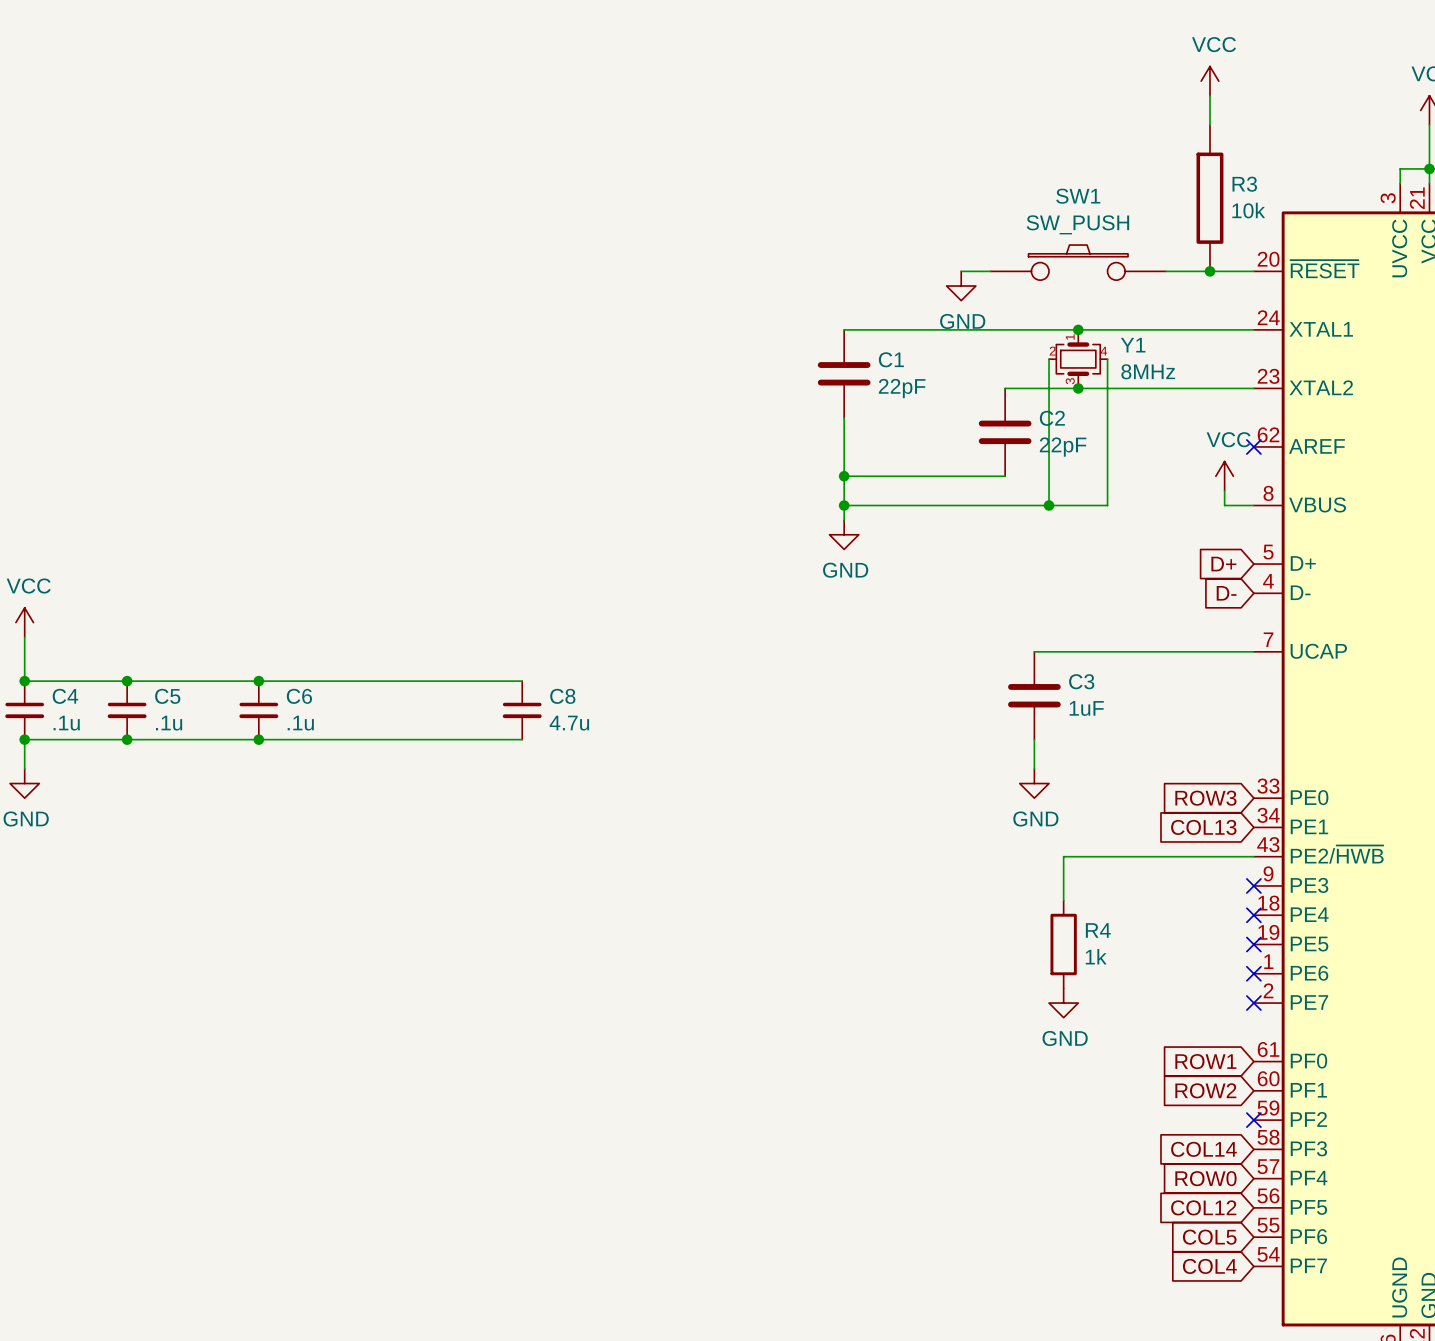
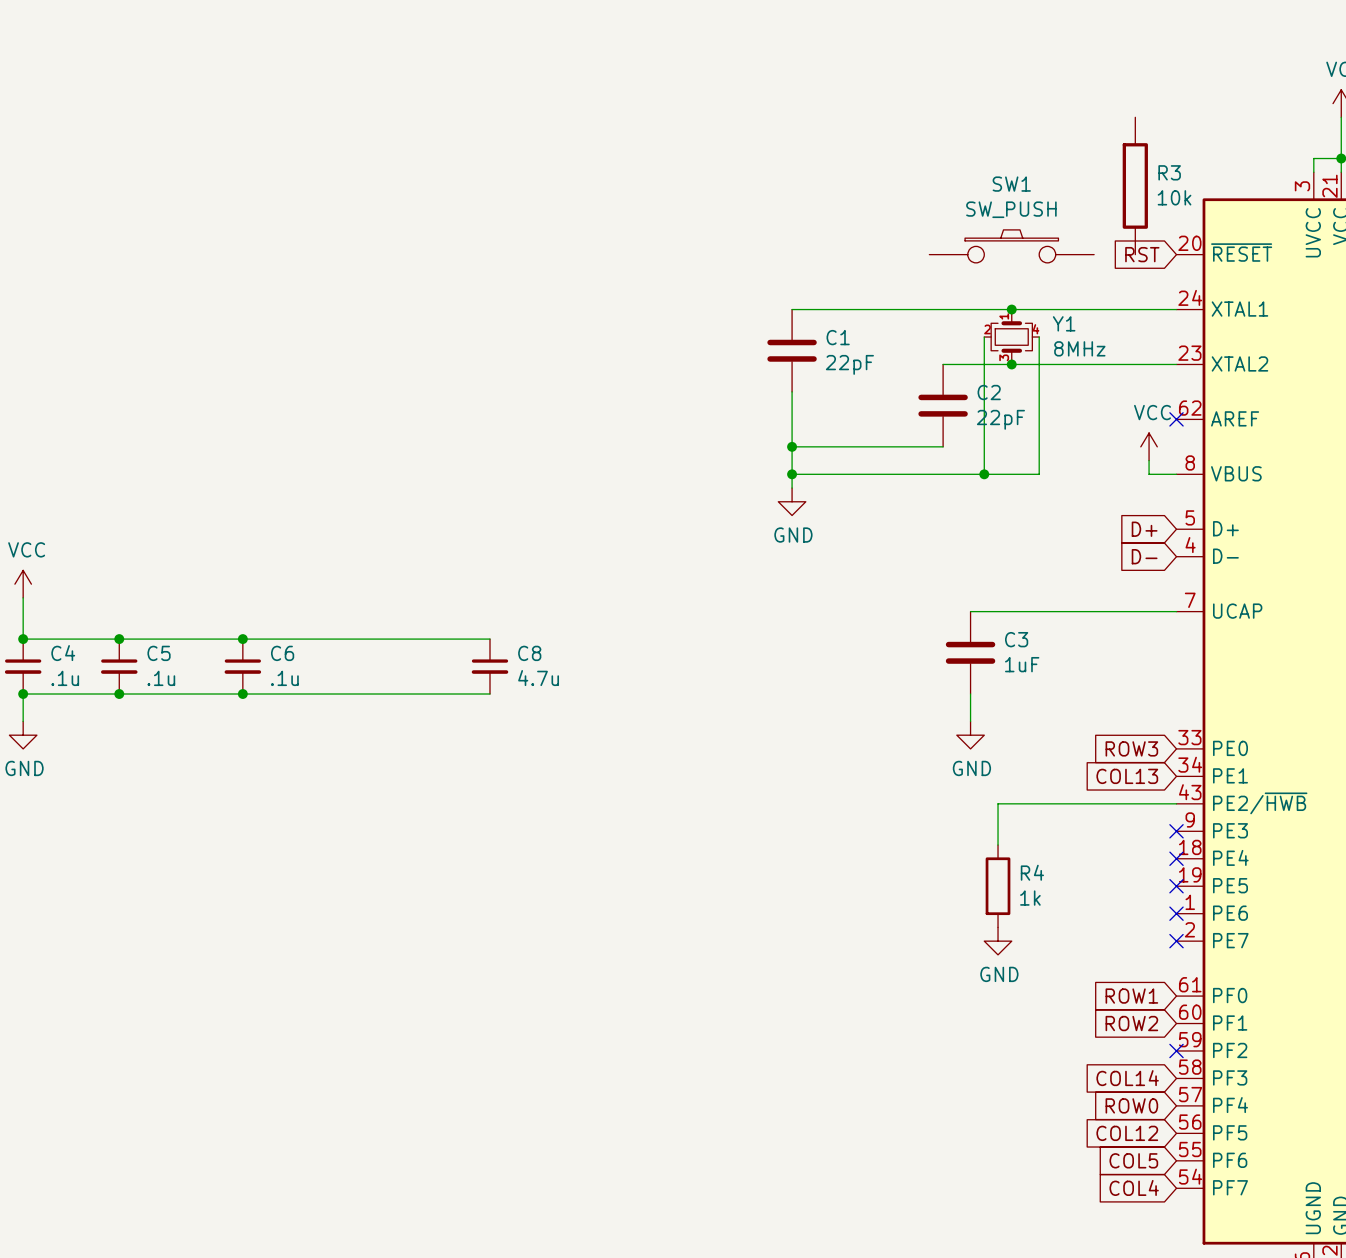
power symbol: VCC (1209, 81) -> none
wire: (1209, 95) (1209, 125) -> none
wire: (961, 271) (990, 271) -> none
wire: (1166, 271) (1253, 271) -> none
junction: (1209, 271) -> none
global label: none -> RST (1142, 254)
power symbol: GND (961, 286) -> none

